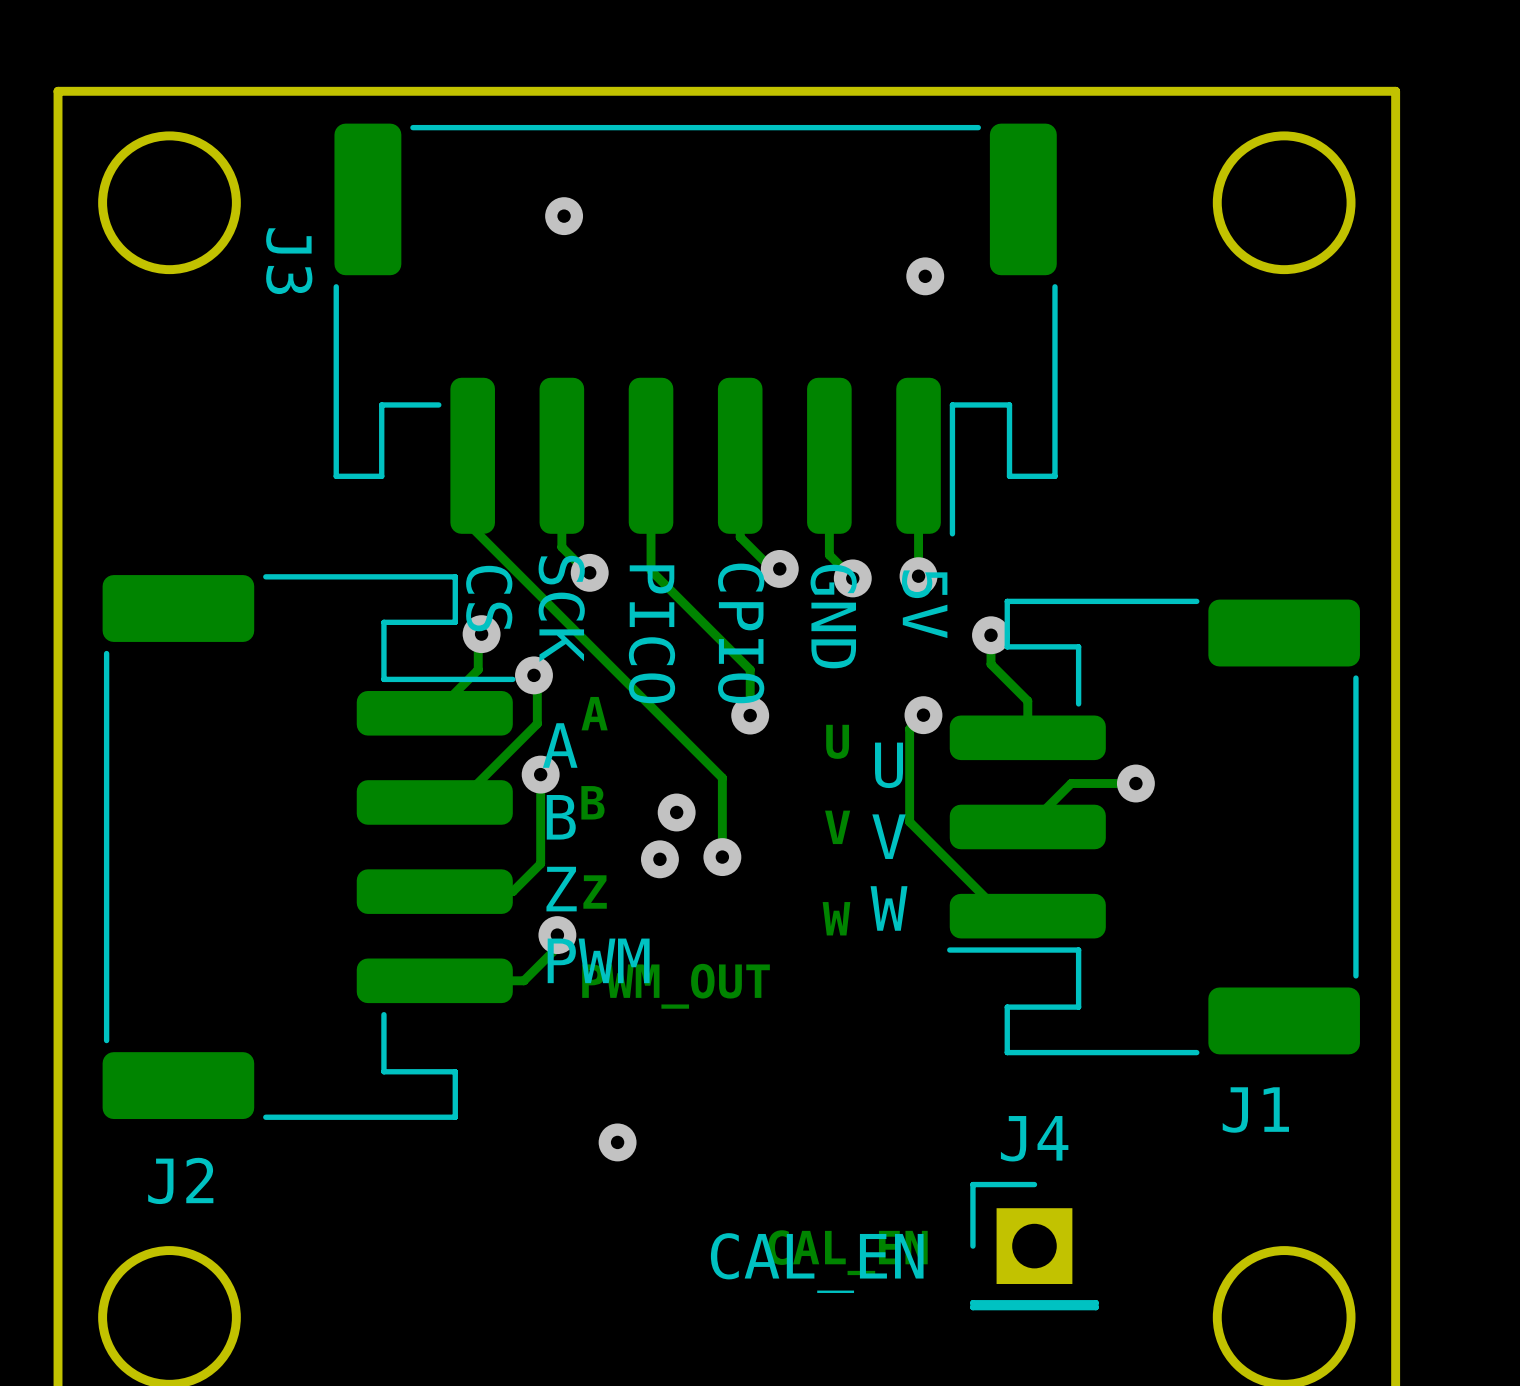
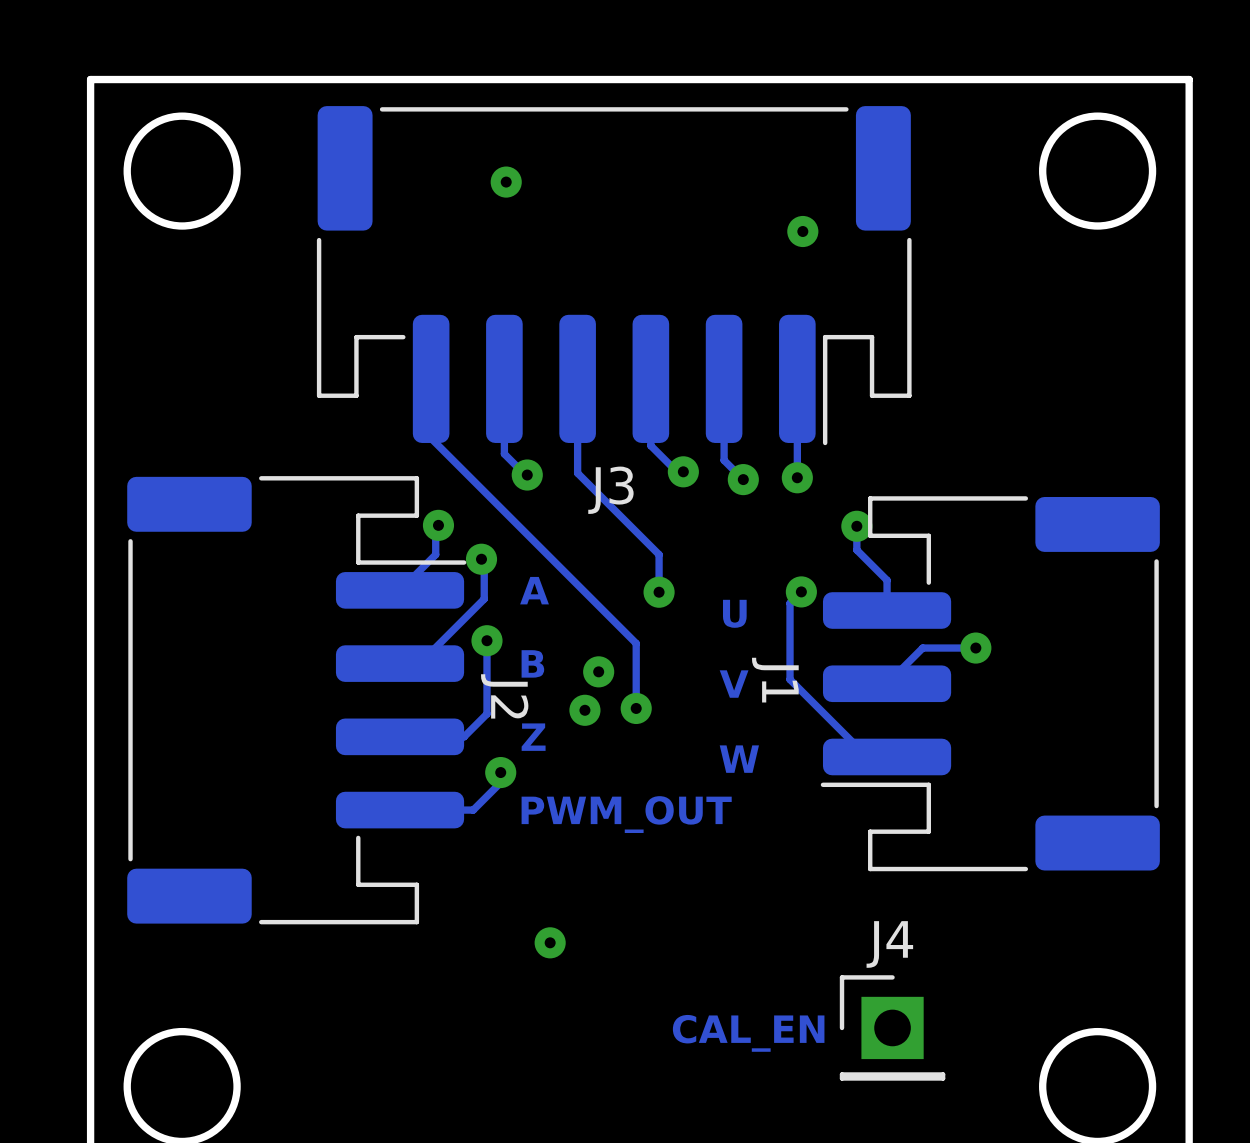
J3 name rotation: 0° (289, 261) -> 90° counterclockwise (610, 490)
J3 name position: J3 (289, 261) -> J3 (610, 490)
text: CS (489, 598) -> none
text: 5V (924, 604) -> none
text: SCK (561, 608) -> none
text: GND (833, 616) -> none
text: CPIO (741, 633) -> none
text: PICO (651, 634) -> none
text: A (560, 745) -> none
text: U (889, 765) -> none
text: B (561, 817) -> none
text: V (889, 836) -> none
text: Z (561, 889) -> none
text: W (889, 908) -> none
text: PWM (598, 960) -> none
J1 name rotation: 0° (1255, 1109) -> 90° clockwise (775, 680)
J1 name position: J1 (1255, 1109) -> J1 (775, 680)
J2 name rotation: 0° (180, 1180) -> 90° clockwise (504, 696)
J2 name position: J2 (180, 1180) -> J2 (504, 696)
text: CAL_EN (817, 1263) -> none

